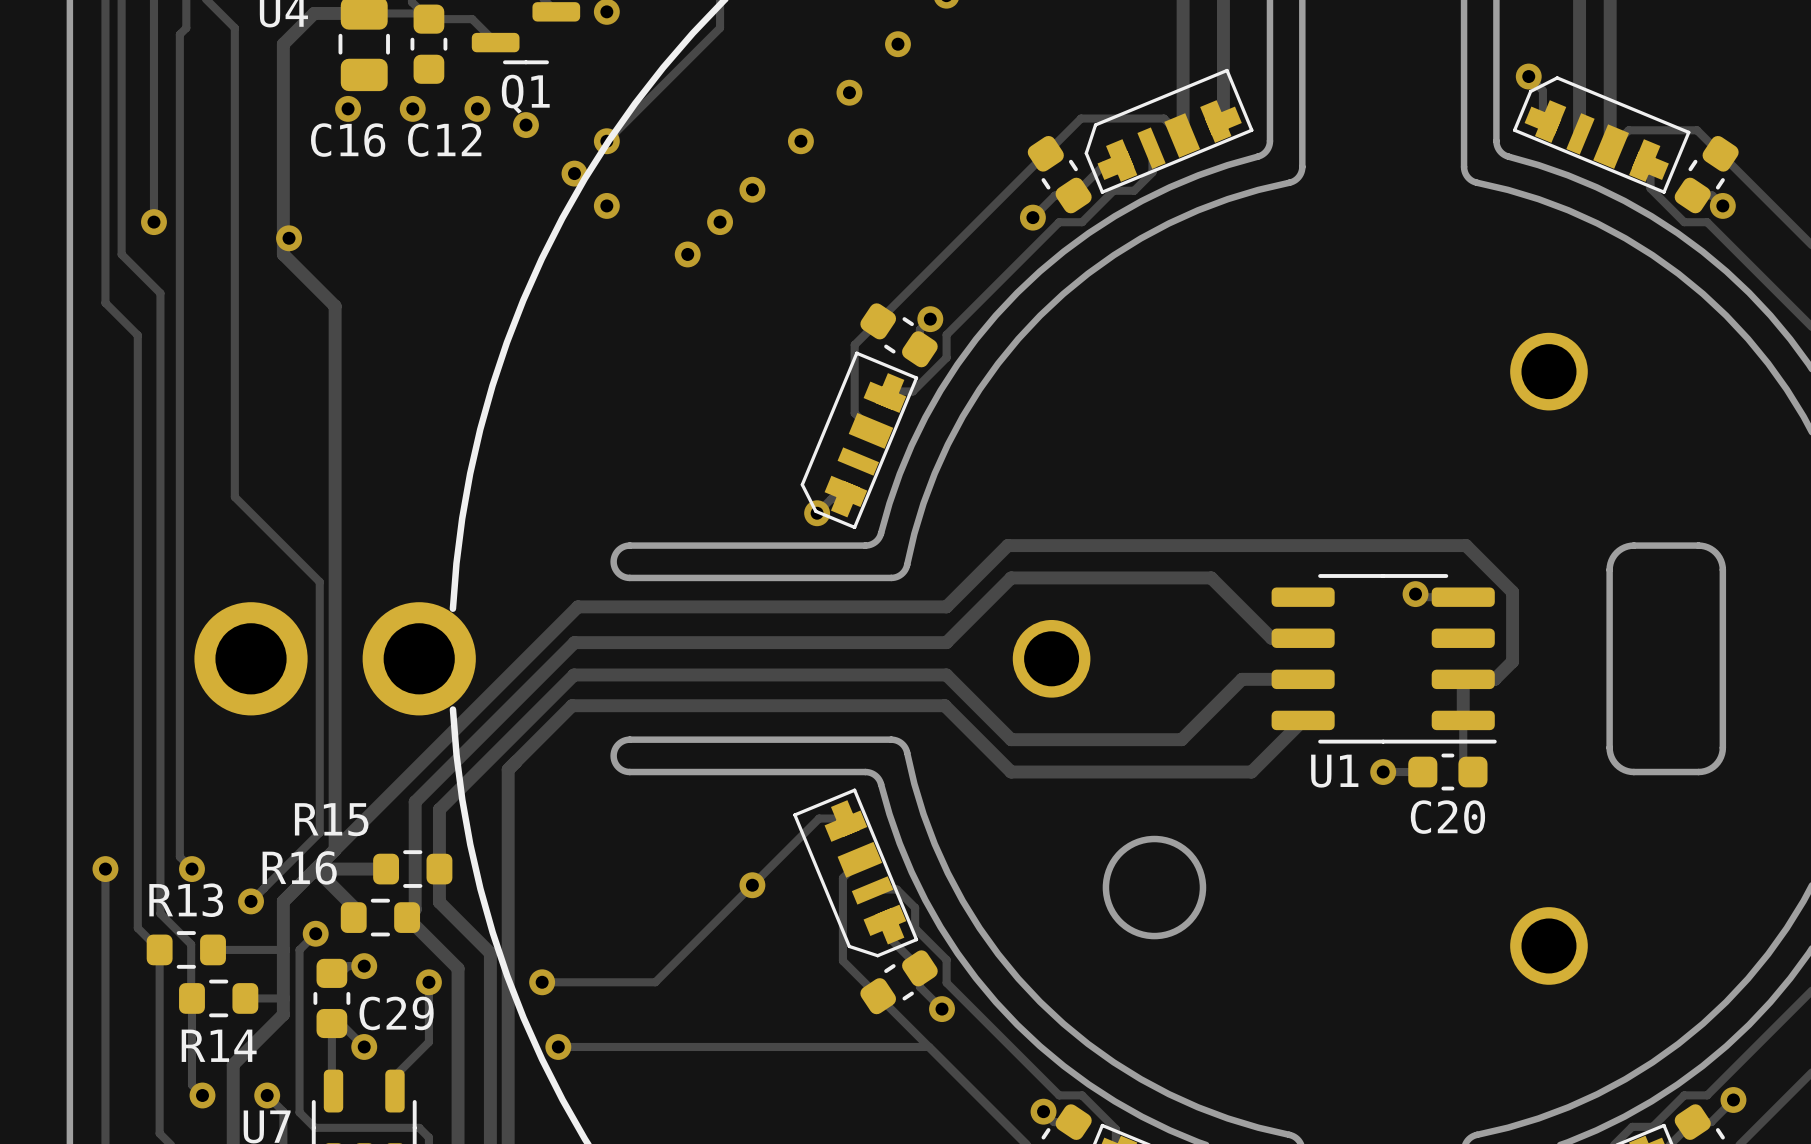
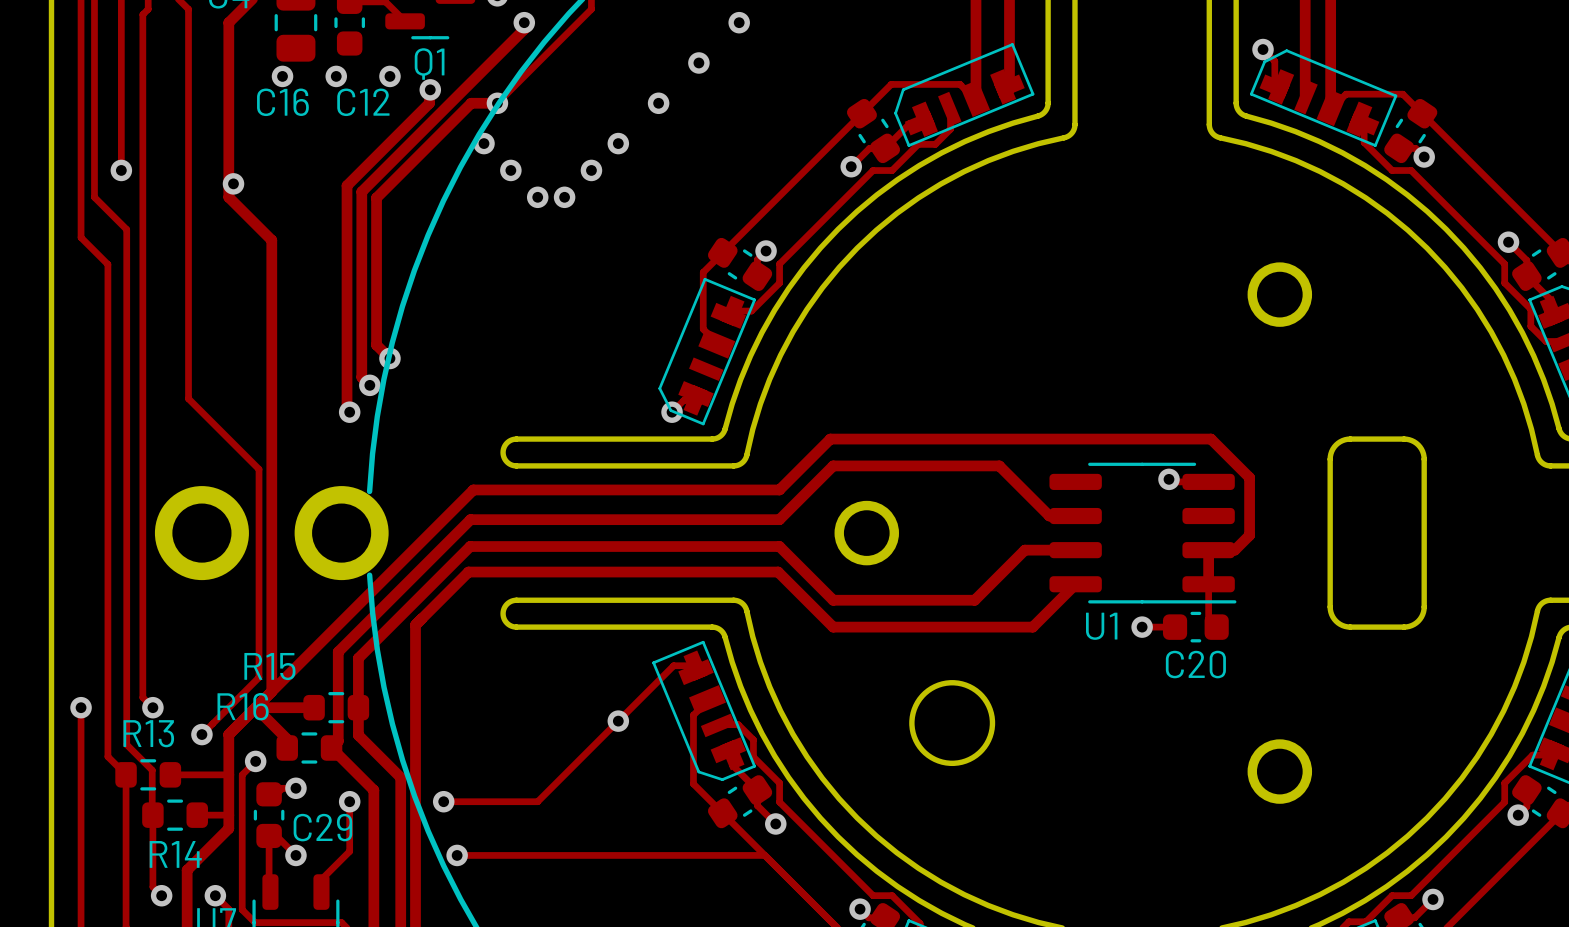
track: none -> (524, 22) (524, 29) (361, 191) (361, 377) (369, 385)
via: none -> (524, 22)
track: none -> (429, 89) (429, 103) (347, 185) (347, 409) (349, 412)
track: none -> (497, 103) (471, 103) (376, 197) (376, 345) (389, 358)
via: (574, 173) -> none
via: none -> (484, 143)
via: (606, 205) -> none
via: none -> (510, 170)
via: none -> (537, 197)
via: none -> (389, 358)
via: none -> (369, 385)
via: none -> (349, 412)

